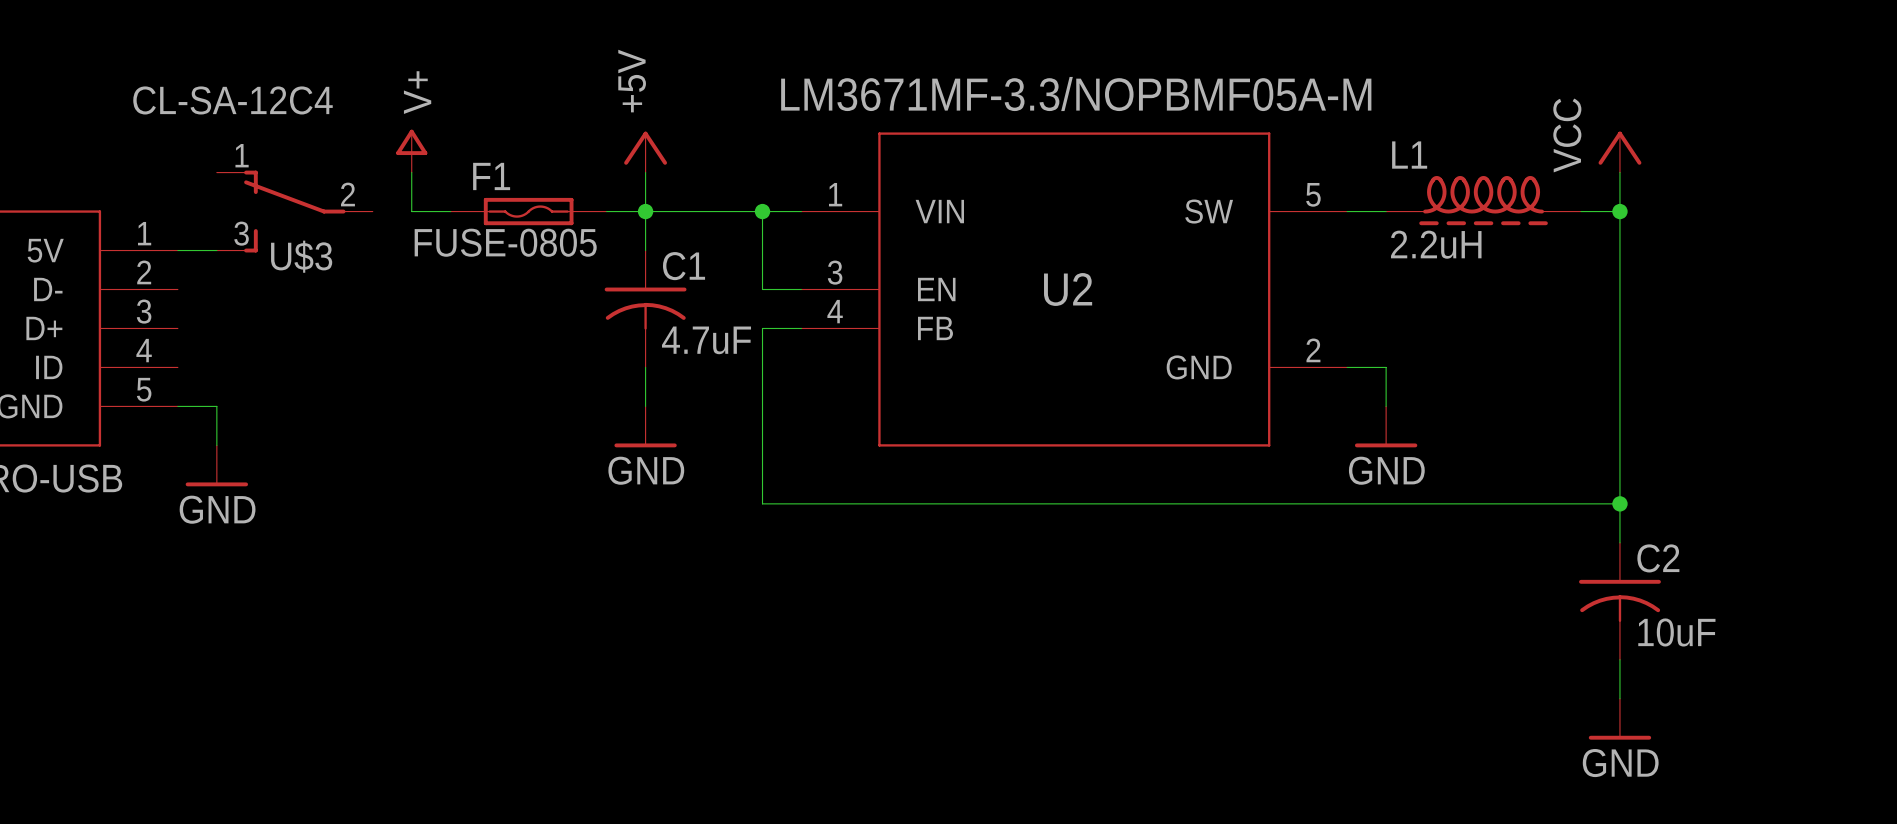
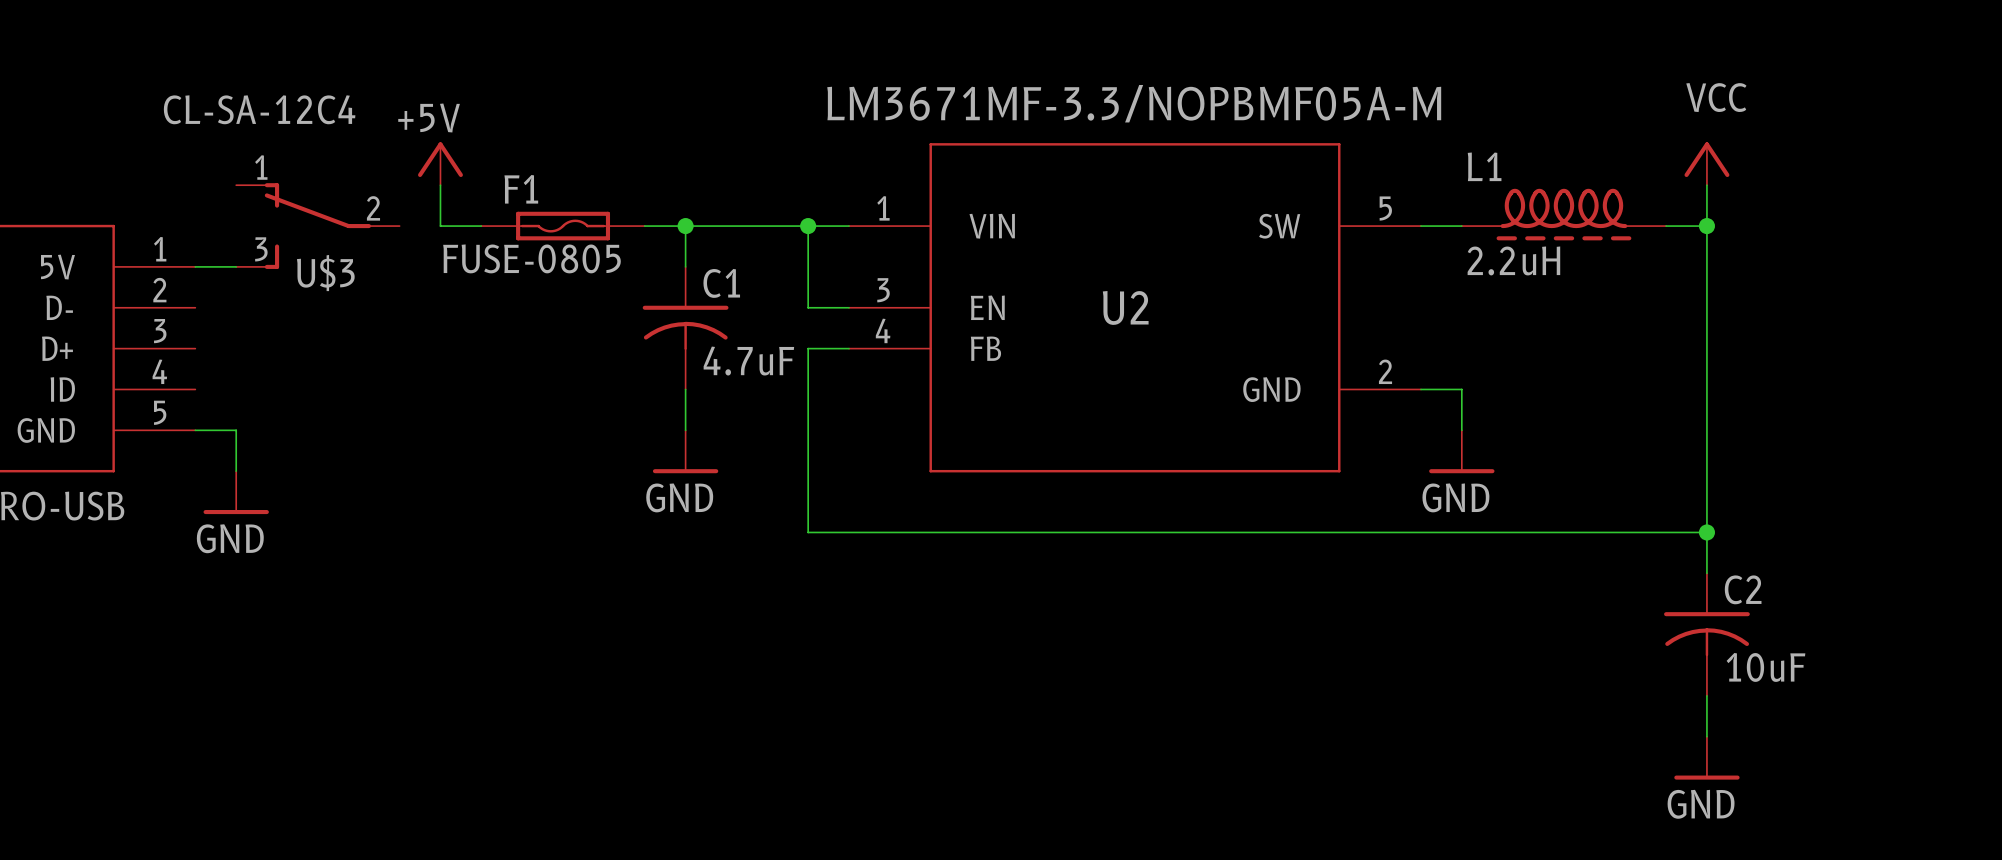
power symbol text rotation: 0° (1567, 135) -> 90° clockwise (1716, 97)
power symbol: V+ (411, 151) -> +5V (440, 163)
power symbol: +5V (645, 152) -> none
wire: (645, 172) (645, 211) -> none

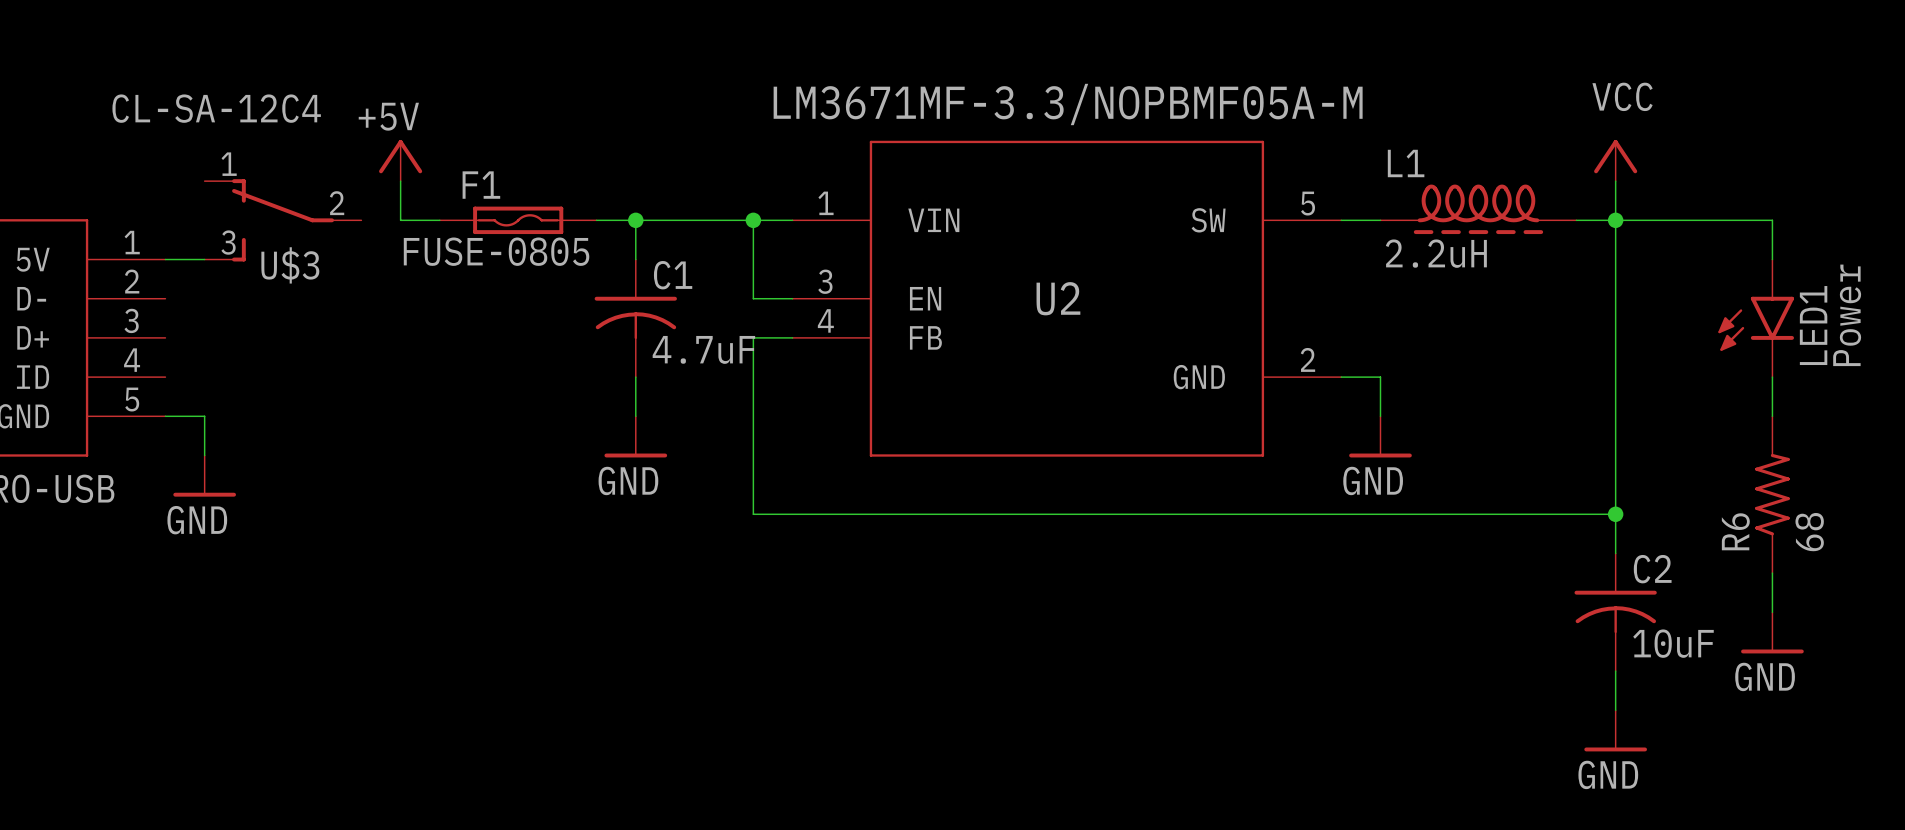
wire: none -> (1615, 220) (1772, 220) (1772, 259)
LED1: none -> Power (1756, 318)
wire: none -> (1772, 377) (1772, 416)
R6: none -> 68 (1772, 494)
wire: none -> (1772, 573) (1772, 612)
power symbol: none -> GND (1772, 632)

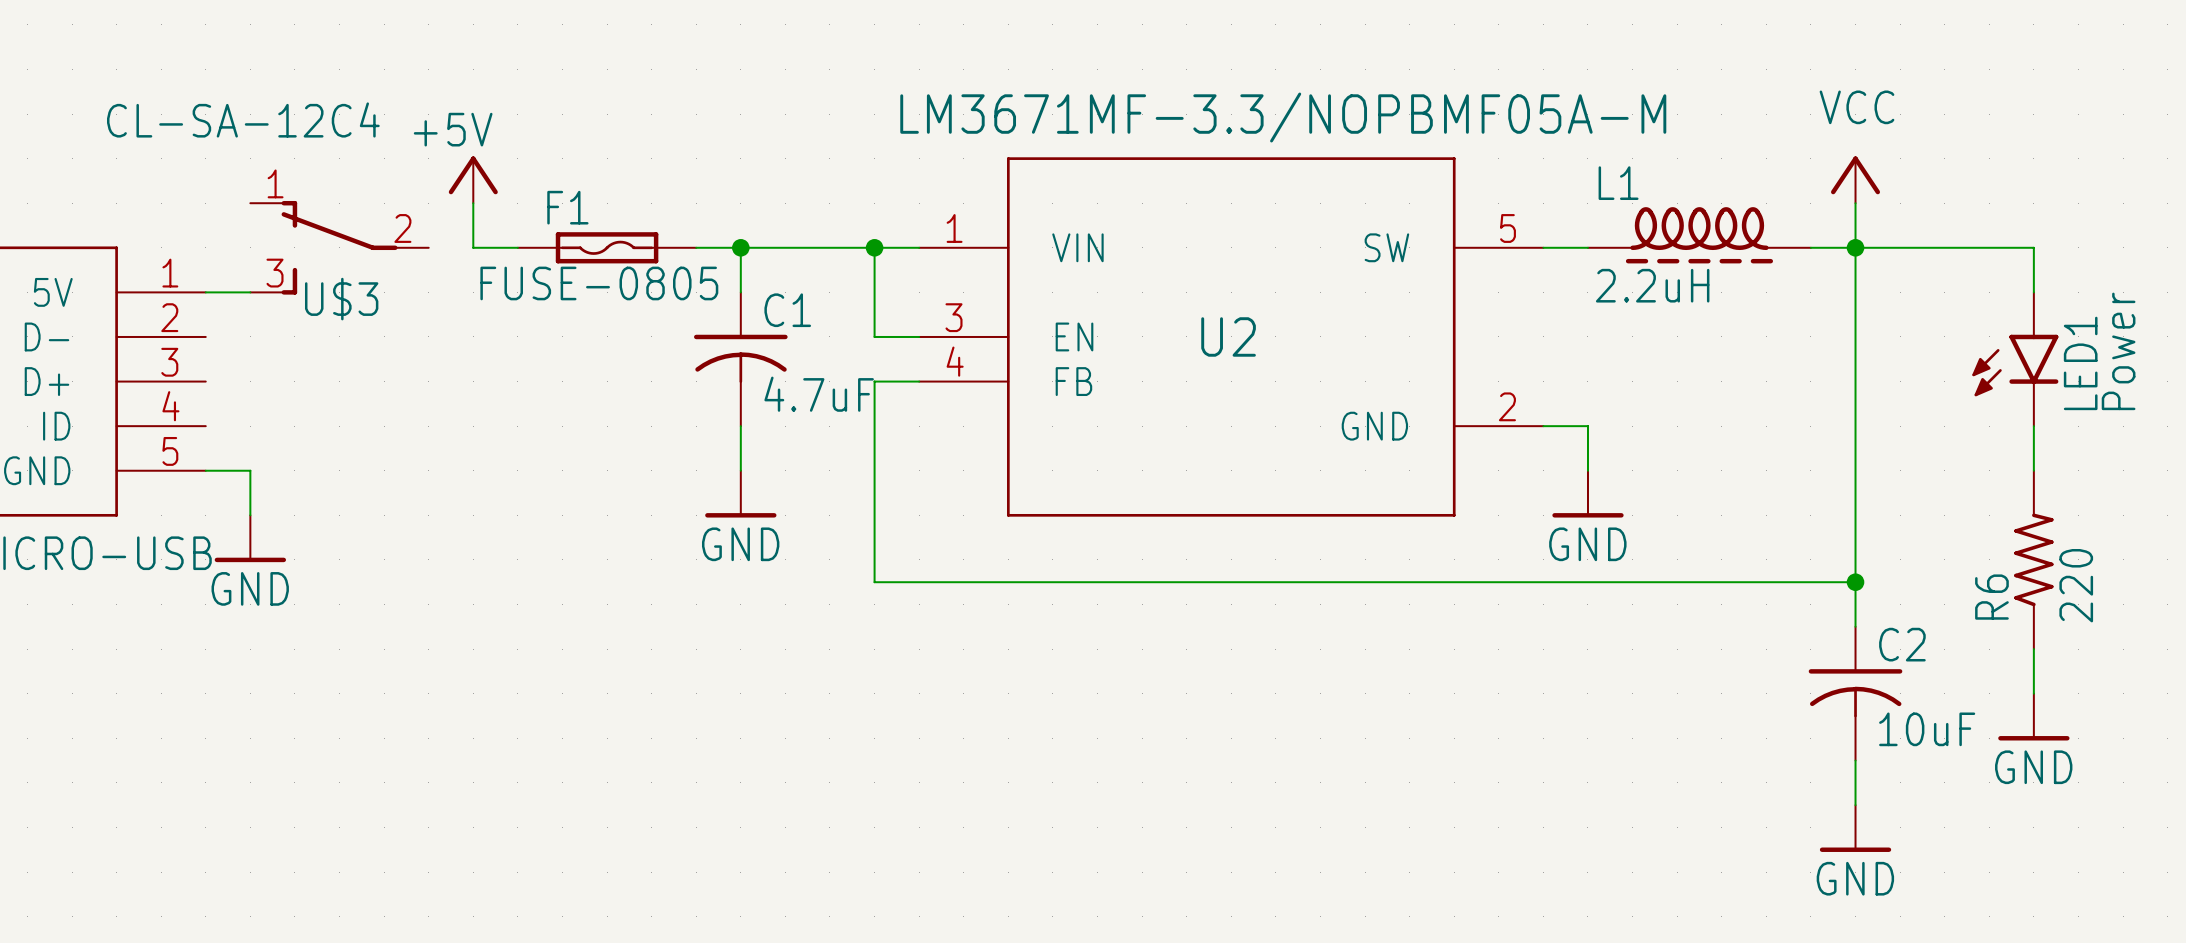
R6 value: 68 (1809, 532) -> 220 (2076, 585)

